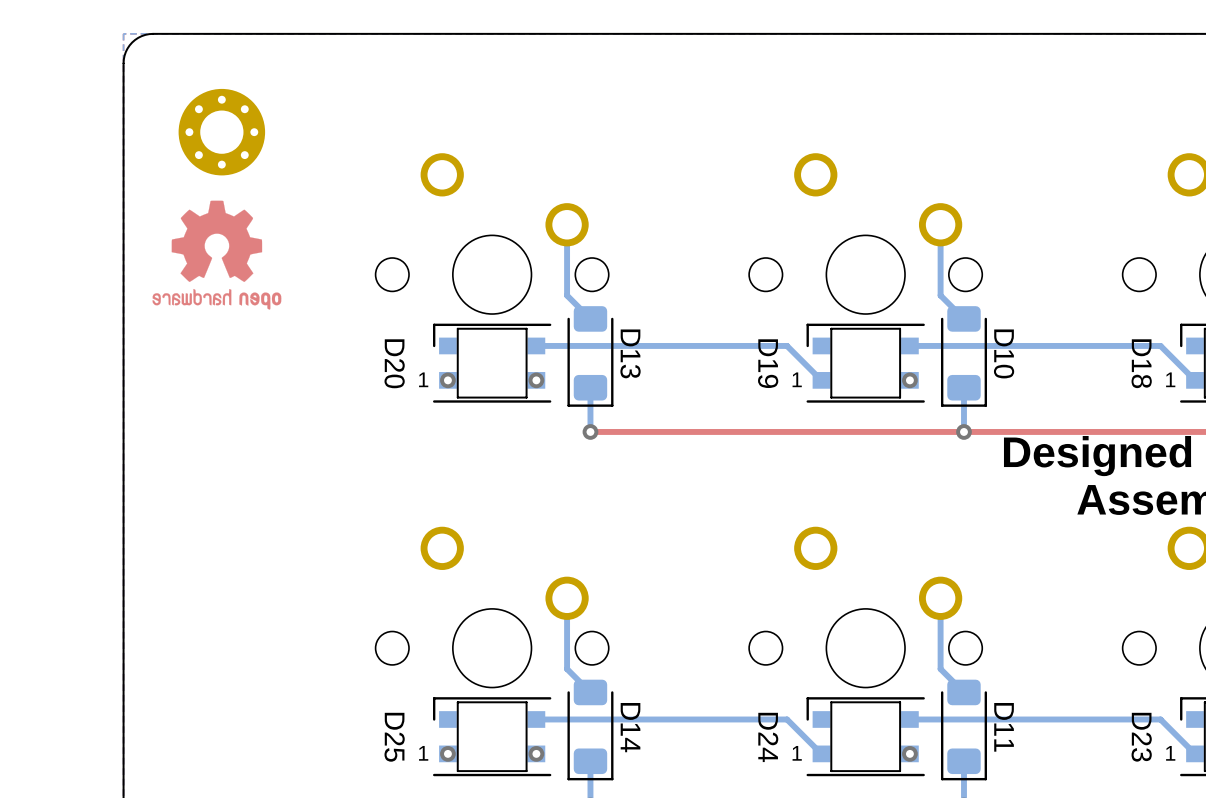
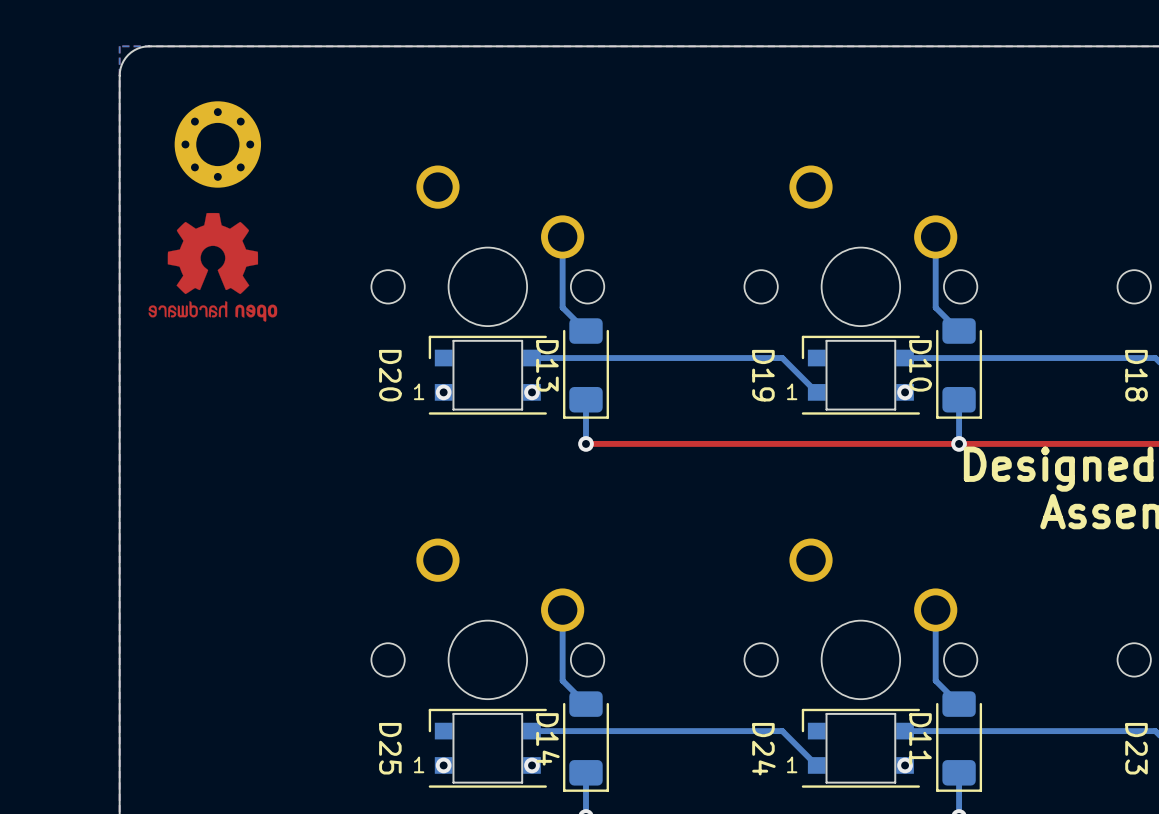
D13 name position: D13 (630, 353) -> D13 (547, 365)
D10 name position: D10 (1004, 353) -> D10 (920, 365)
D14 name position: D14 (630, 727) -> D14 (547, 739)
D11 name position: D11 (1004, 727) -> D11 (920, 738)

